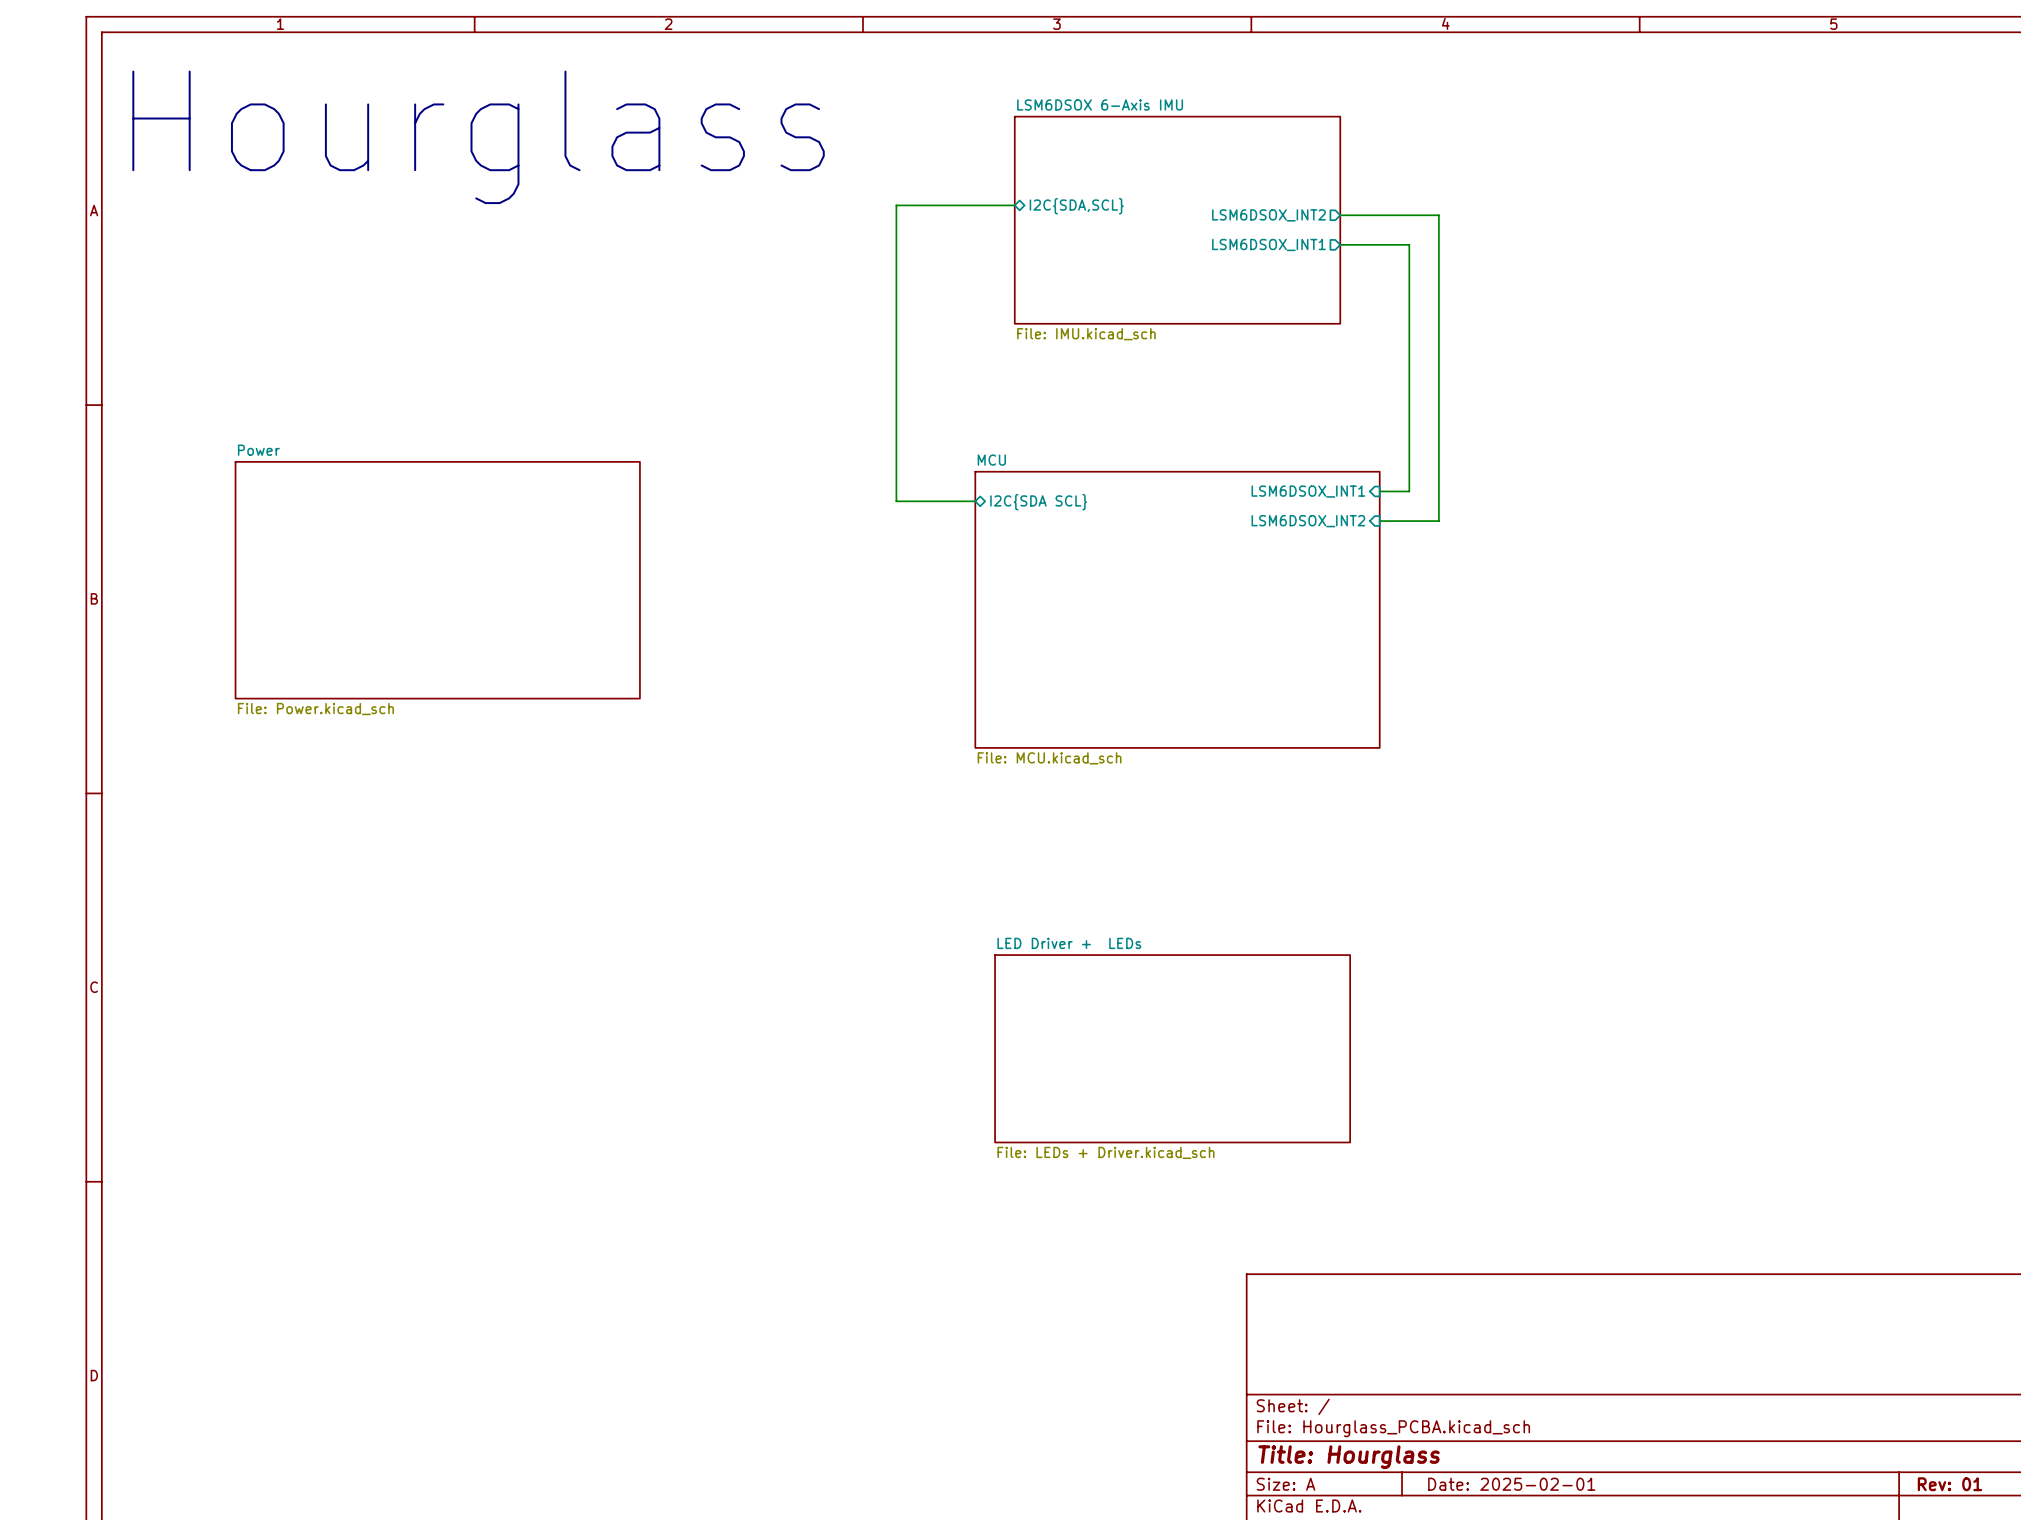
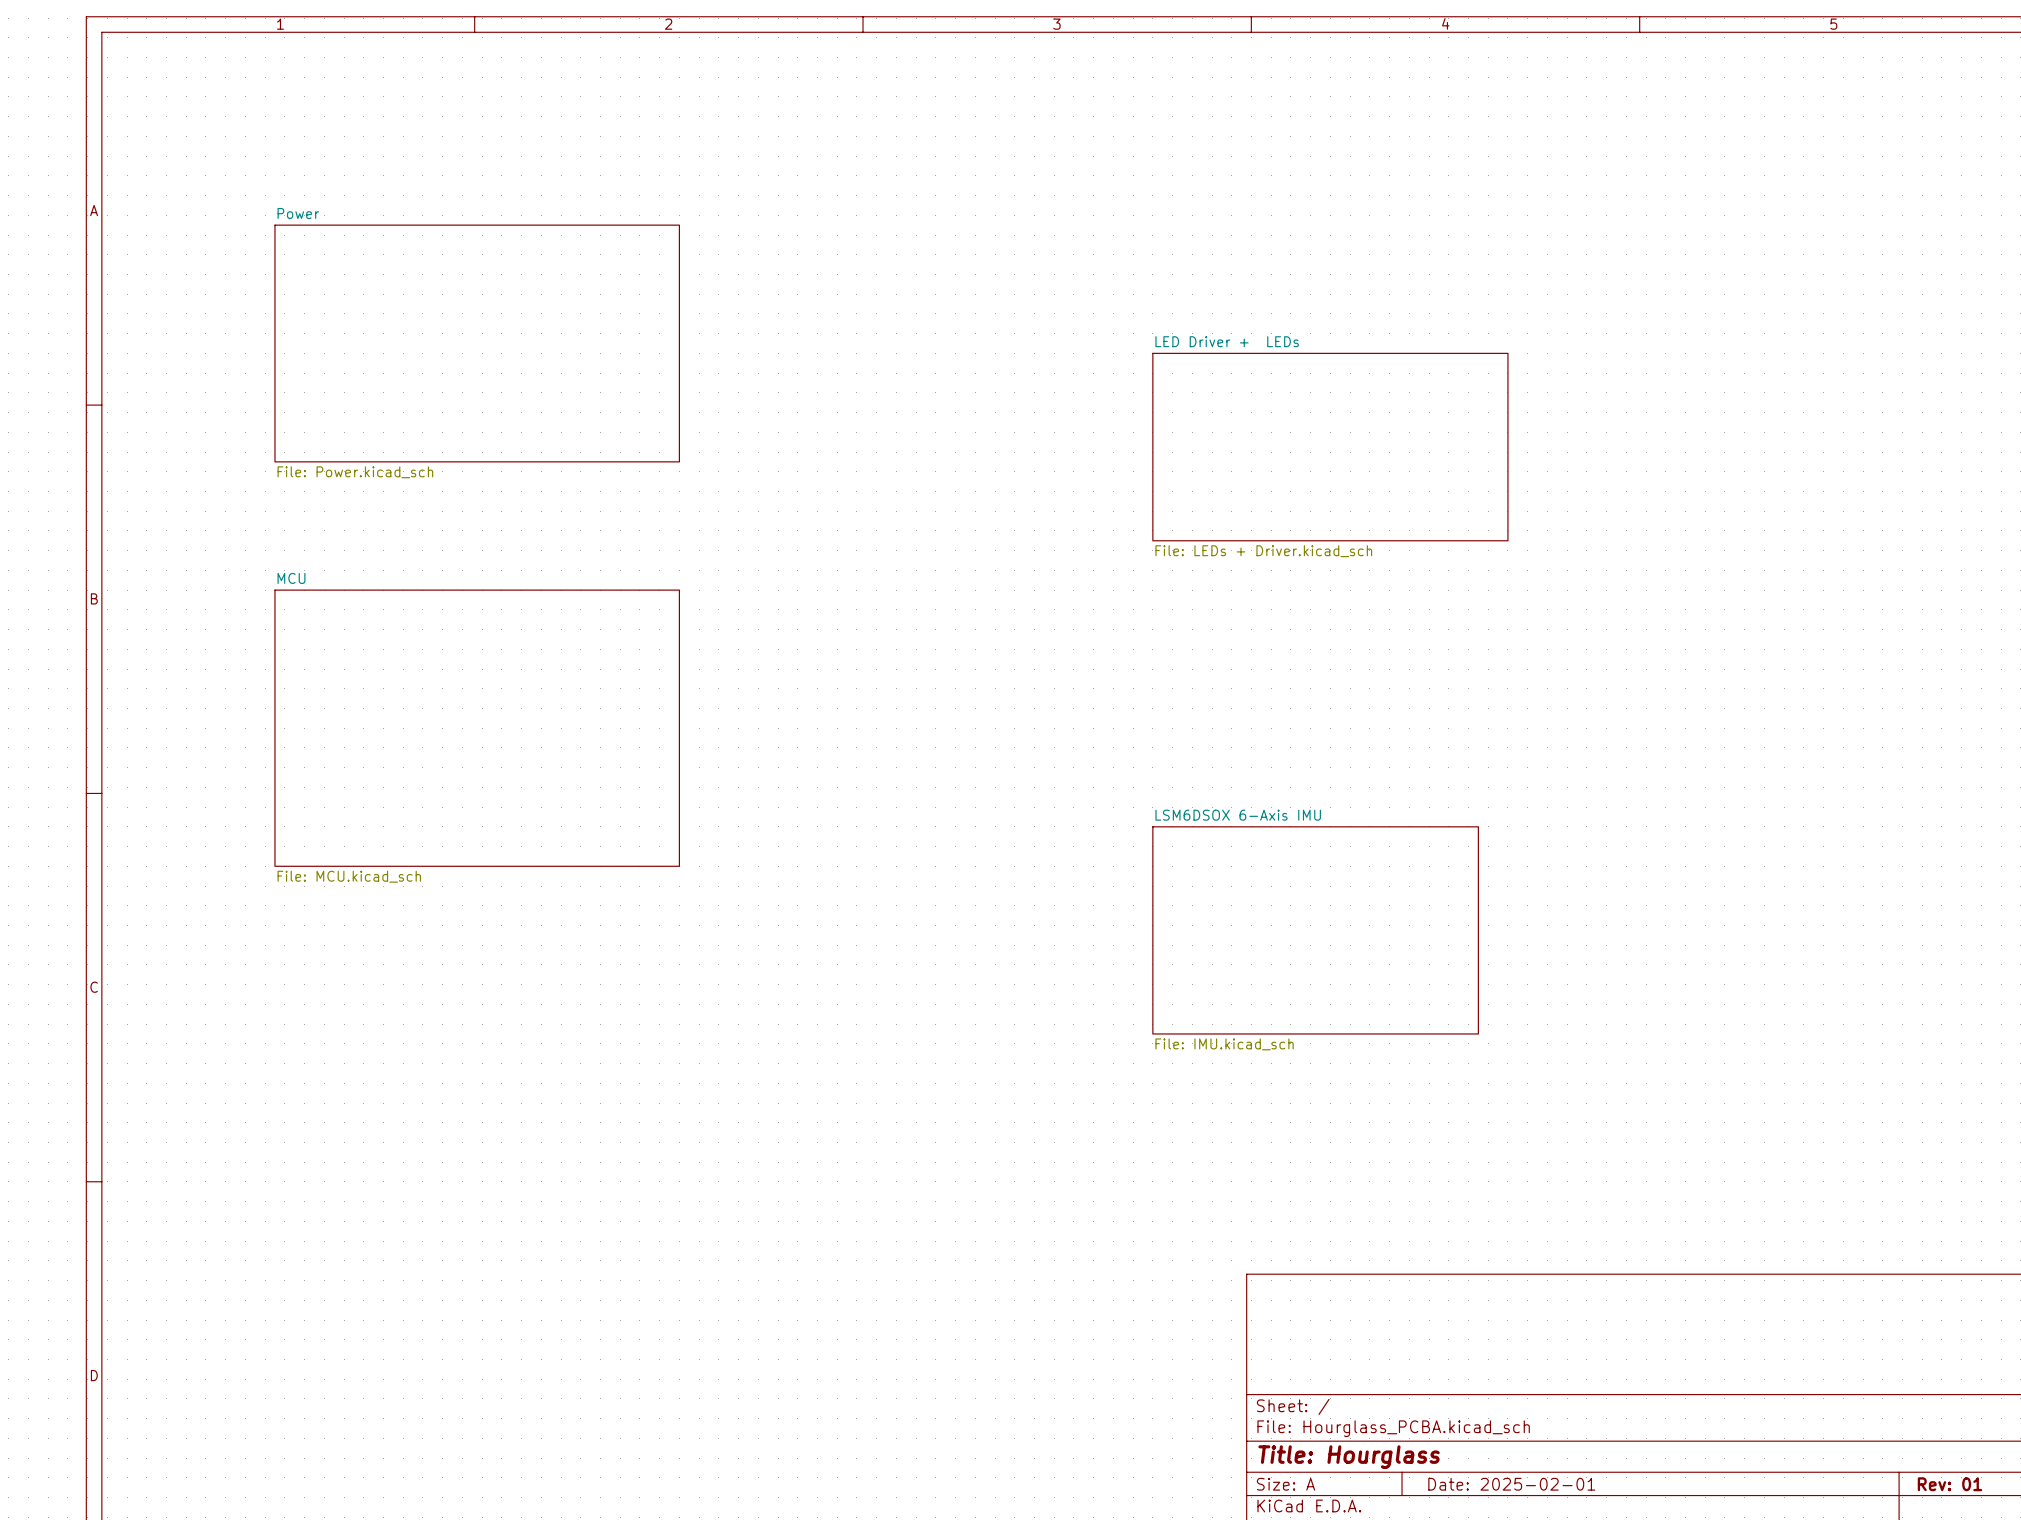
text: Hourglass (478, 137) -> none
wire: (1014, 205) (896, 205) (896, 501) (975, 501) -> none
sheet pin: I2C{SDA,SCL} (1076, 206) -> none
sheet pin: LSM6DSOX_INT2 (1268, 215) -> none
wire: (1340, 215) (1438, 215) (1438, 521) (1379, 521) -> none
sheet LSM6DSOX 6-Axis IMU position: (1177, 220) -> (1315, 930)
sheet pin: LSM6DSOX_INT1 (1268, 244) -> none
wire: (1340, 244) (1409, 244) (1409, 491) (1379, 491) -> none
sheet Power: none -> File: Power.kicad_sch (477, 343)
sheet LED Driver + LEDs: none -> File: LEDs + Driver.kicad_sch (1330, 447)
sheet pin: LSM6DSOX_INT1 (1308, 491) -> none
sheet pin: I2C{SDA SCL} (1038, 502) -> none
sheet pin: LSM6DSOX_INT2 (1308, 521) -> none
sheet Power: File: Power.kicad_sch (437, 580) -> none
sheet MCU: File: MCU.kicad_sch (1177, 609) -> none
sheet MCU: none -> File: MCU.kicad_sch (477, 728)
sheet LED Driver + LEDs: File: LEDs + Driver.kicad_sch (1172, 1048) -> none

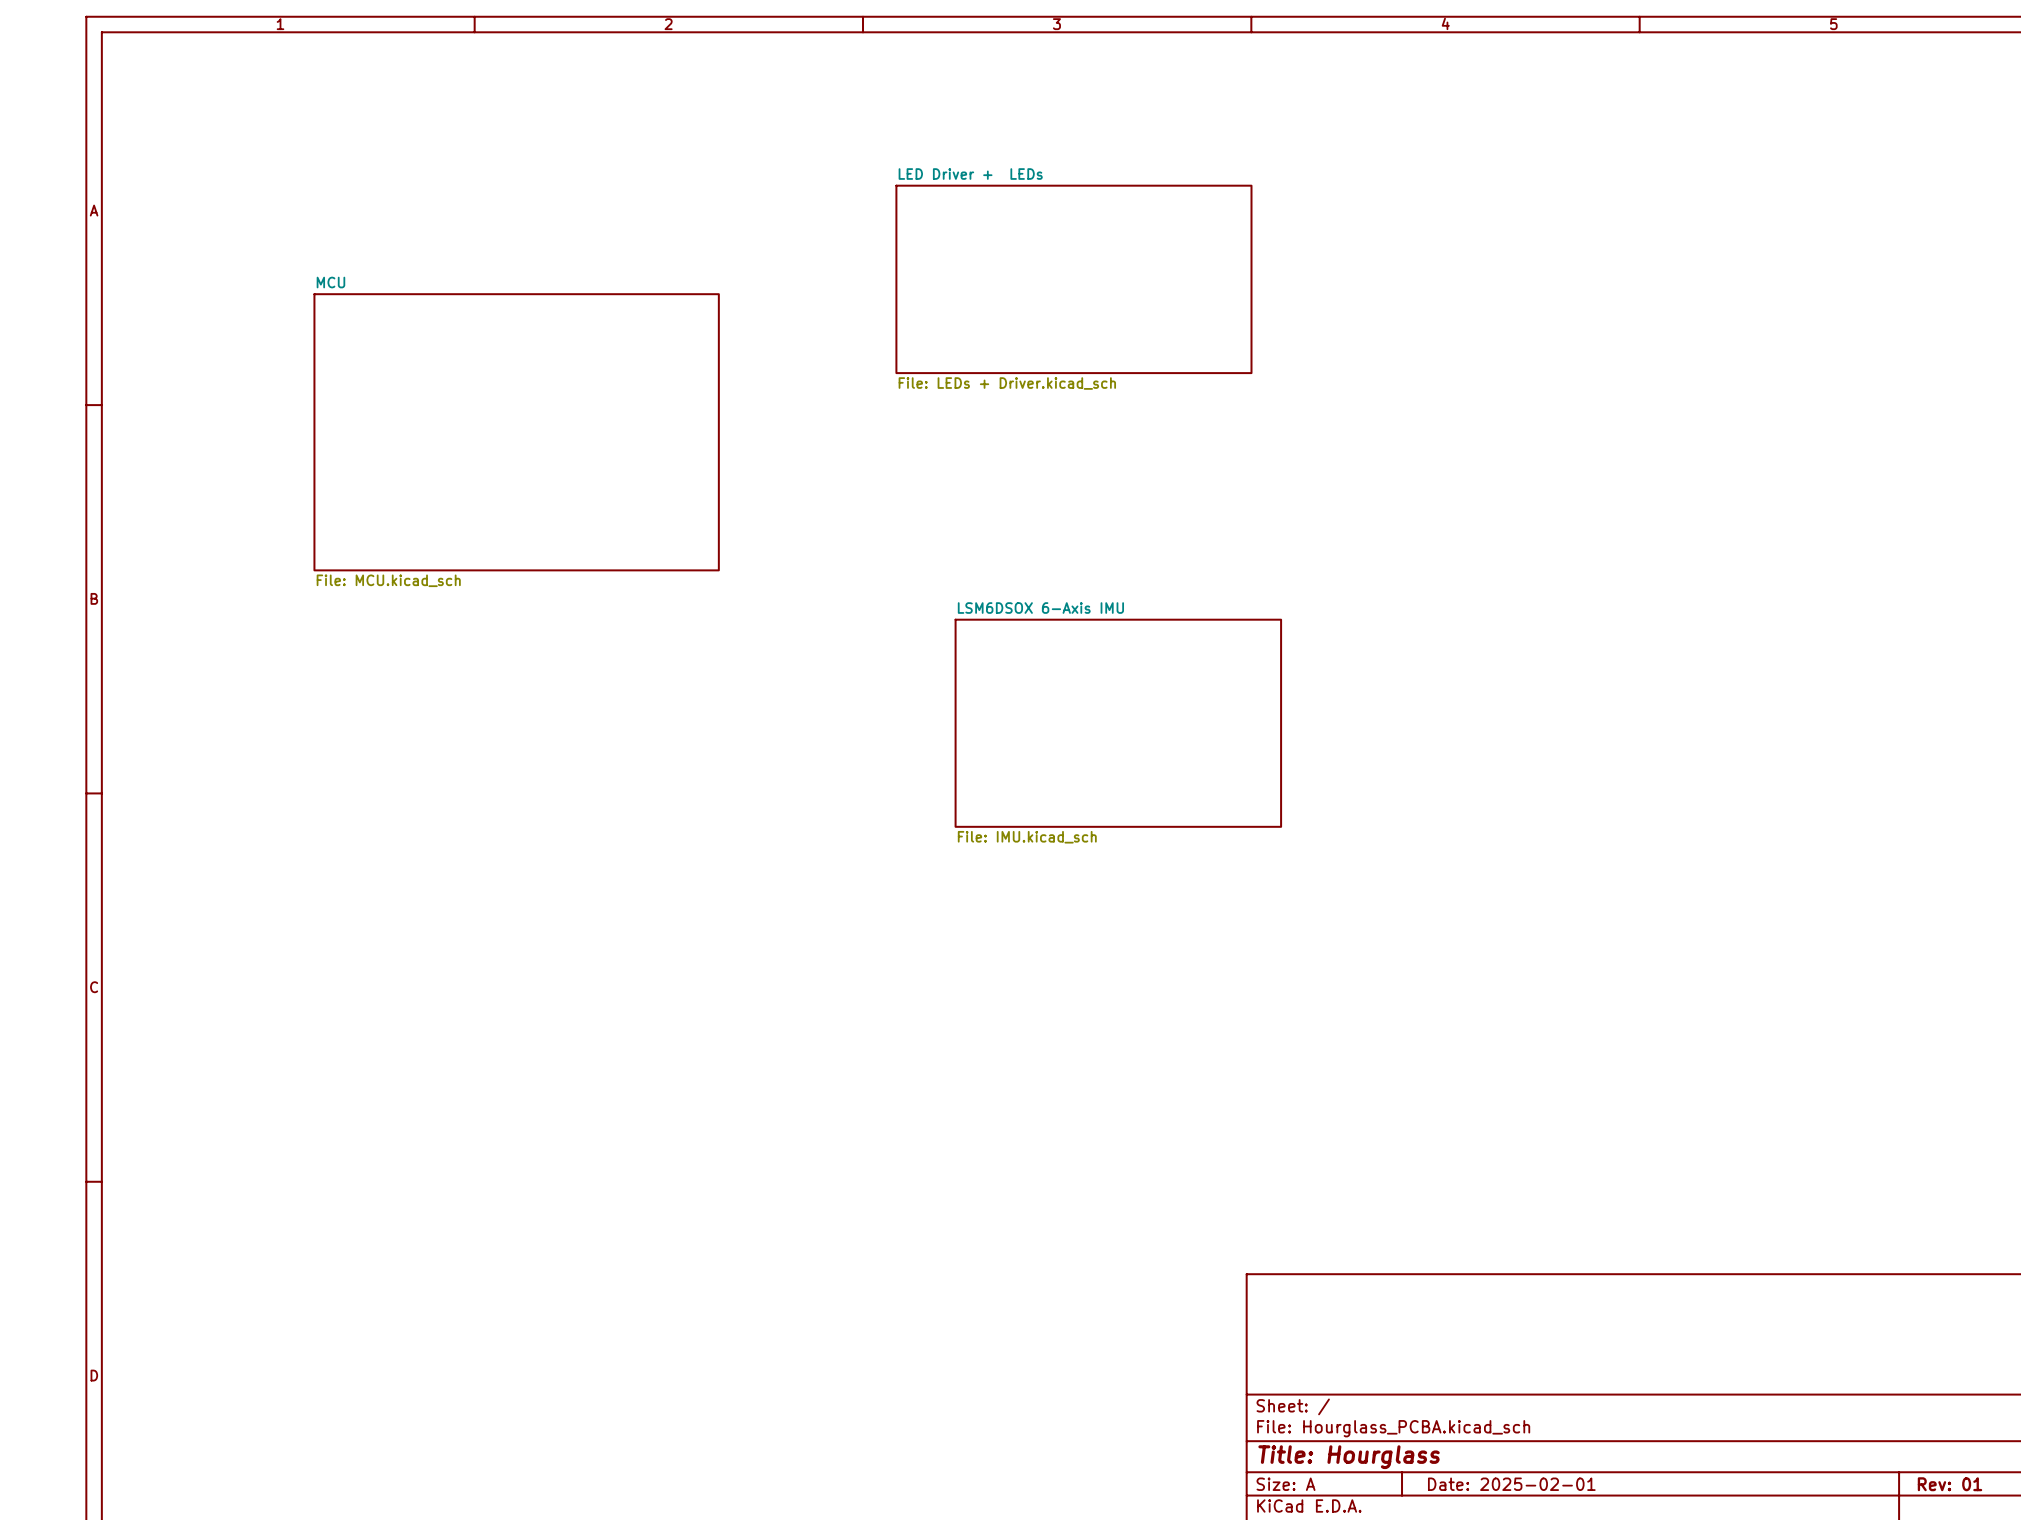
sheet LED Driver + LEDs: none -> File: LEDs + Driver.kicad_sch (1073, 279)
sheet Power: File: Power.kicad_sch (477, 343) -> none
sheet MCU: none -> File: MCU.kicad_sch (516, 432)
sheet LED Driver + LEDs: File: LEDs + Driver.kicad_sch (1330, 447) -> none
sheet MCU: File: MCU.kicad_sch (477, 728) -> none
sheet LSM6DSOX 6-Axis IMU position: (1315, 930) -> (1118, 723)

